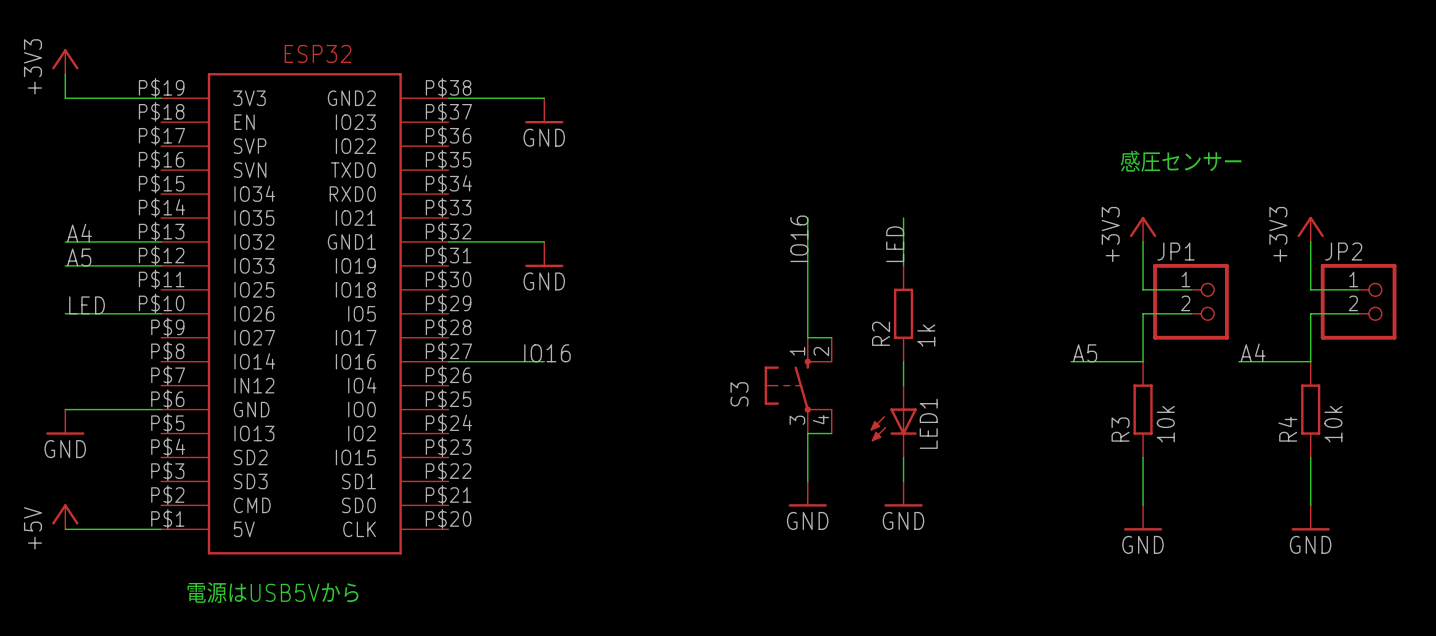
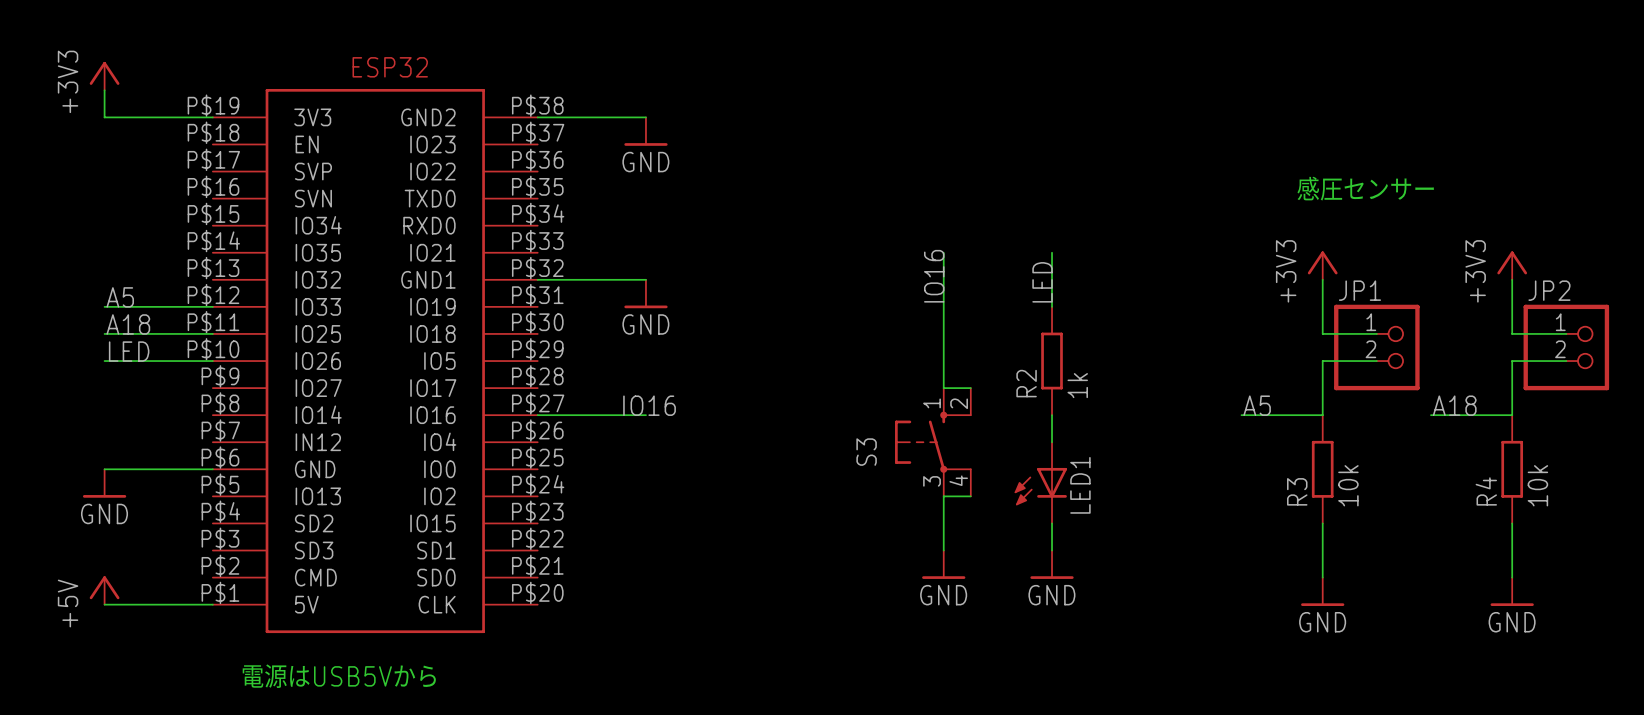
label: A4 (79, 233) -> none
wire: (65, 241) (161, 241) -> (104, 333) (212, 333)
label: none -> A18 (128, 324)
label: A4 (1253, 352) -> A18 (1454, 405)

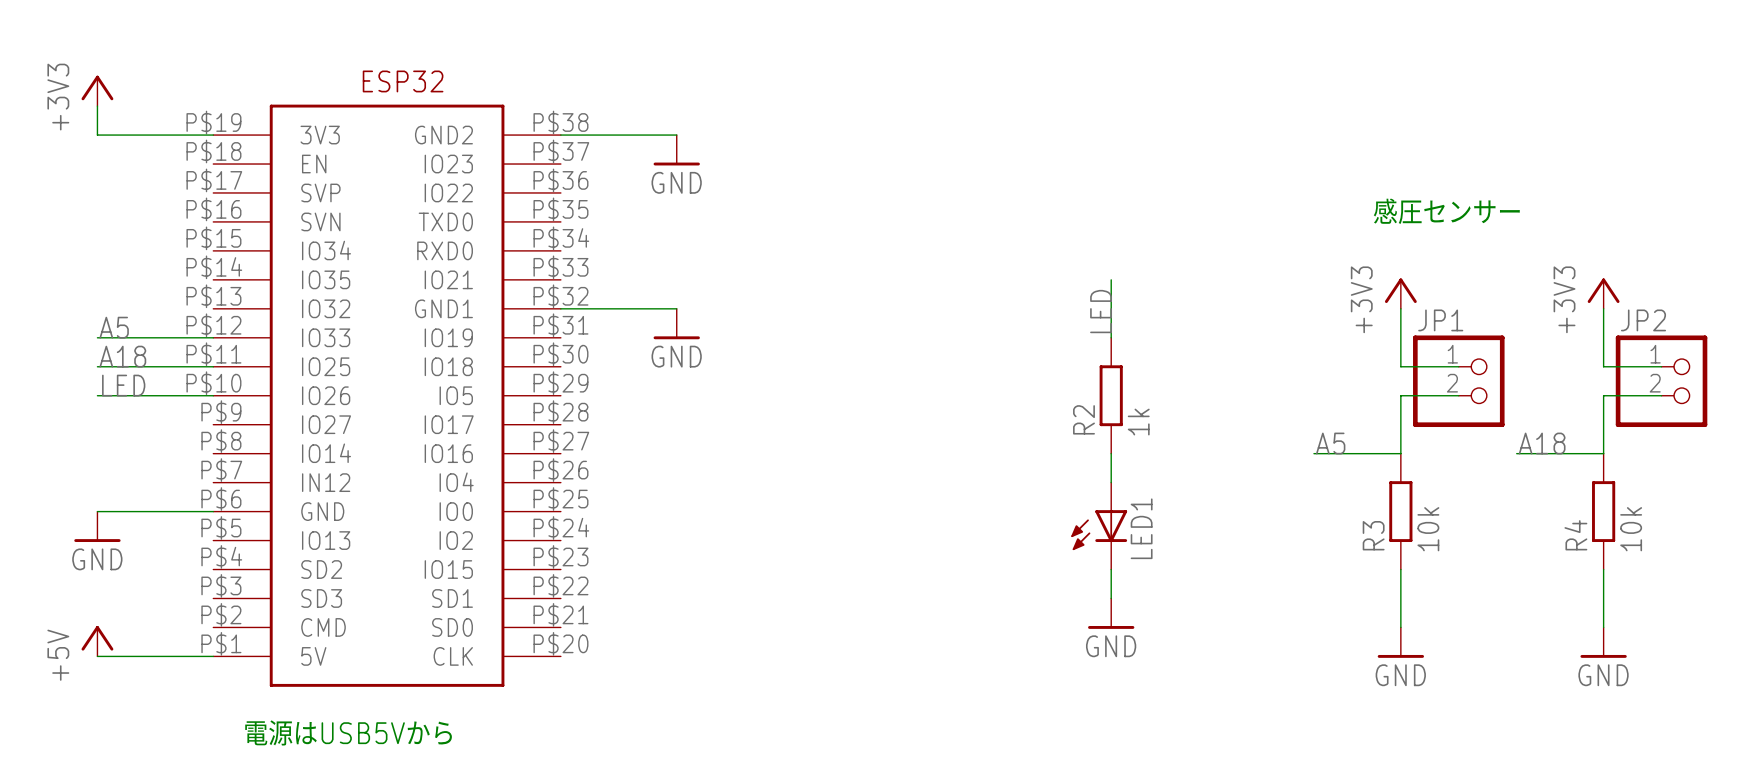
wire: (943, 252) (943, 388) (970, 388) -> none
label: IO16 (934, 276) -> none
label: IO16 (649, 405) -> none
wire: (537, 415) (645, 415) -> none
S3: (933, 442) -> none
wire: (970, 496) (943, 496) (943, 550) -> none
power symbol: GND (943, 564) -> none

